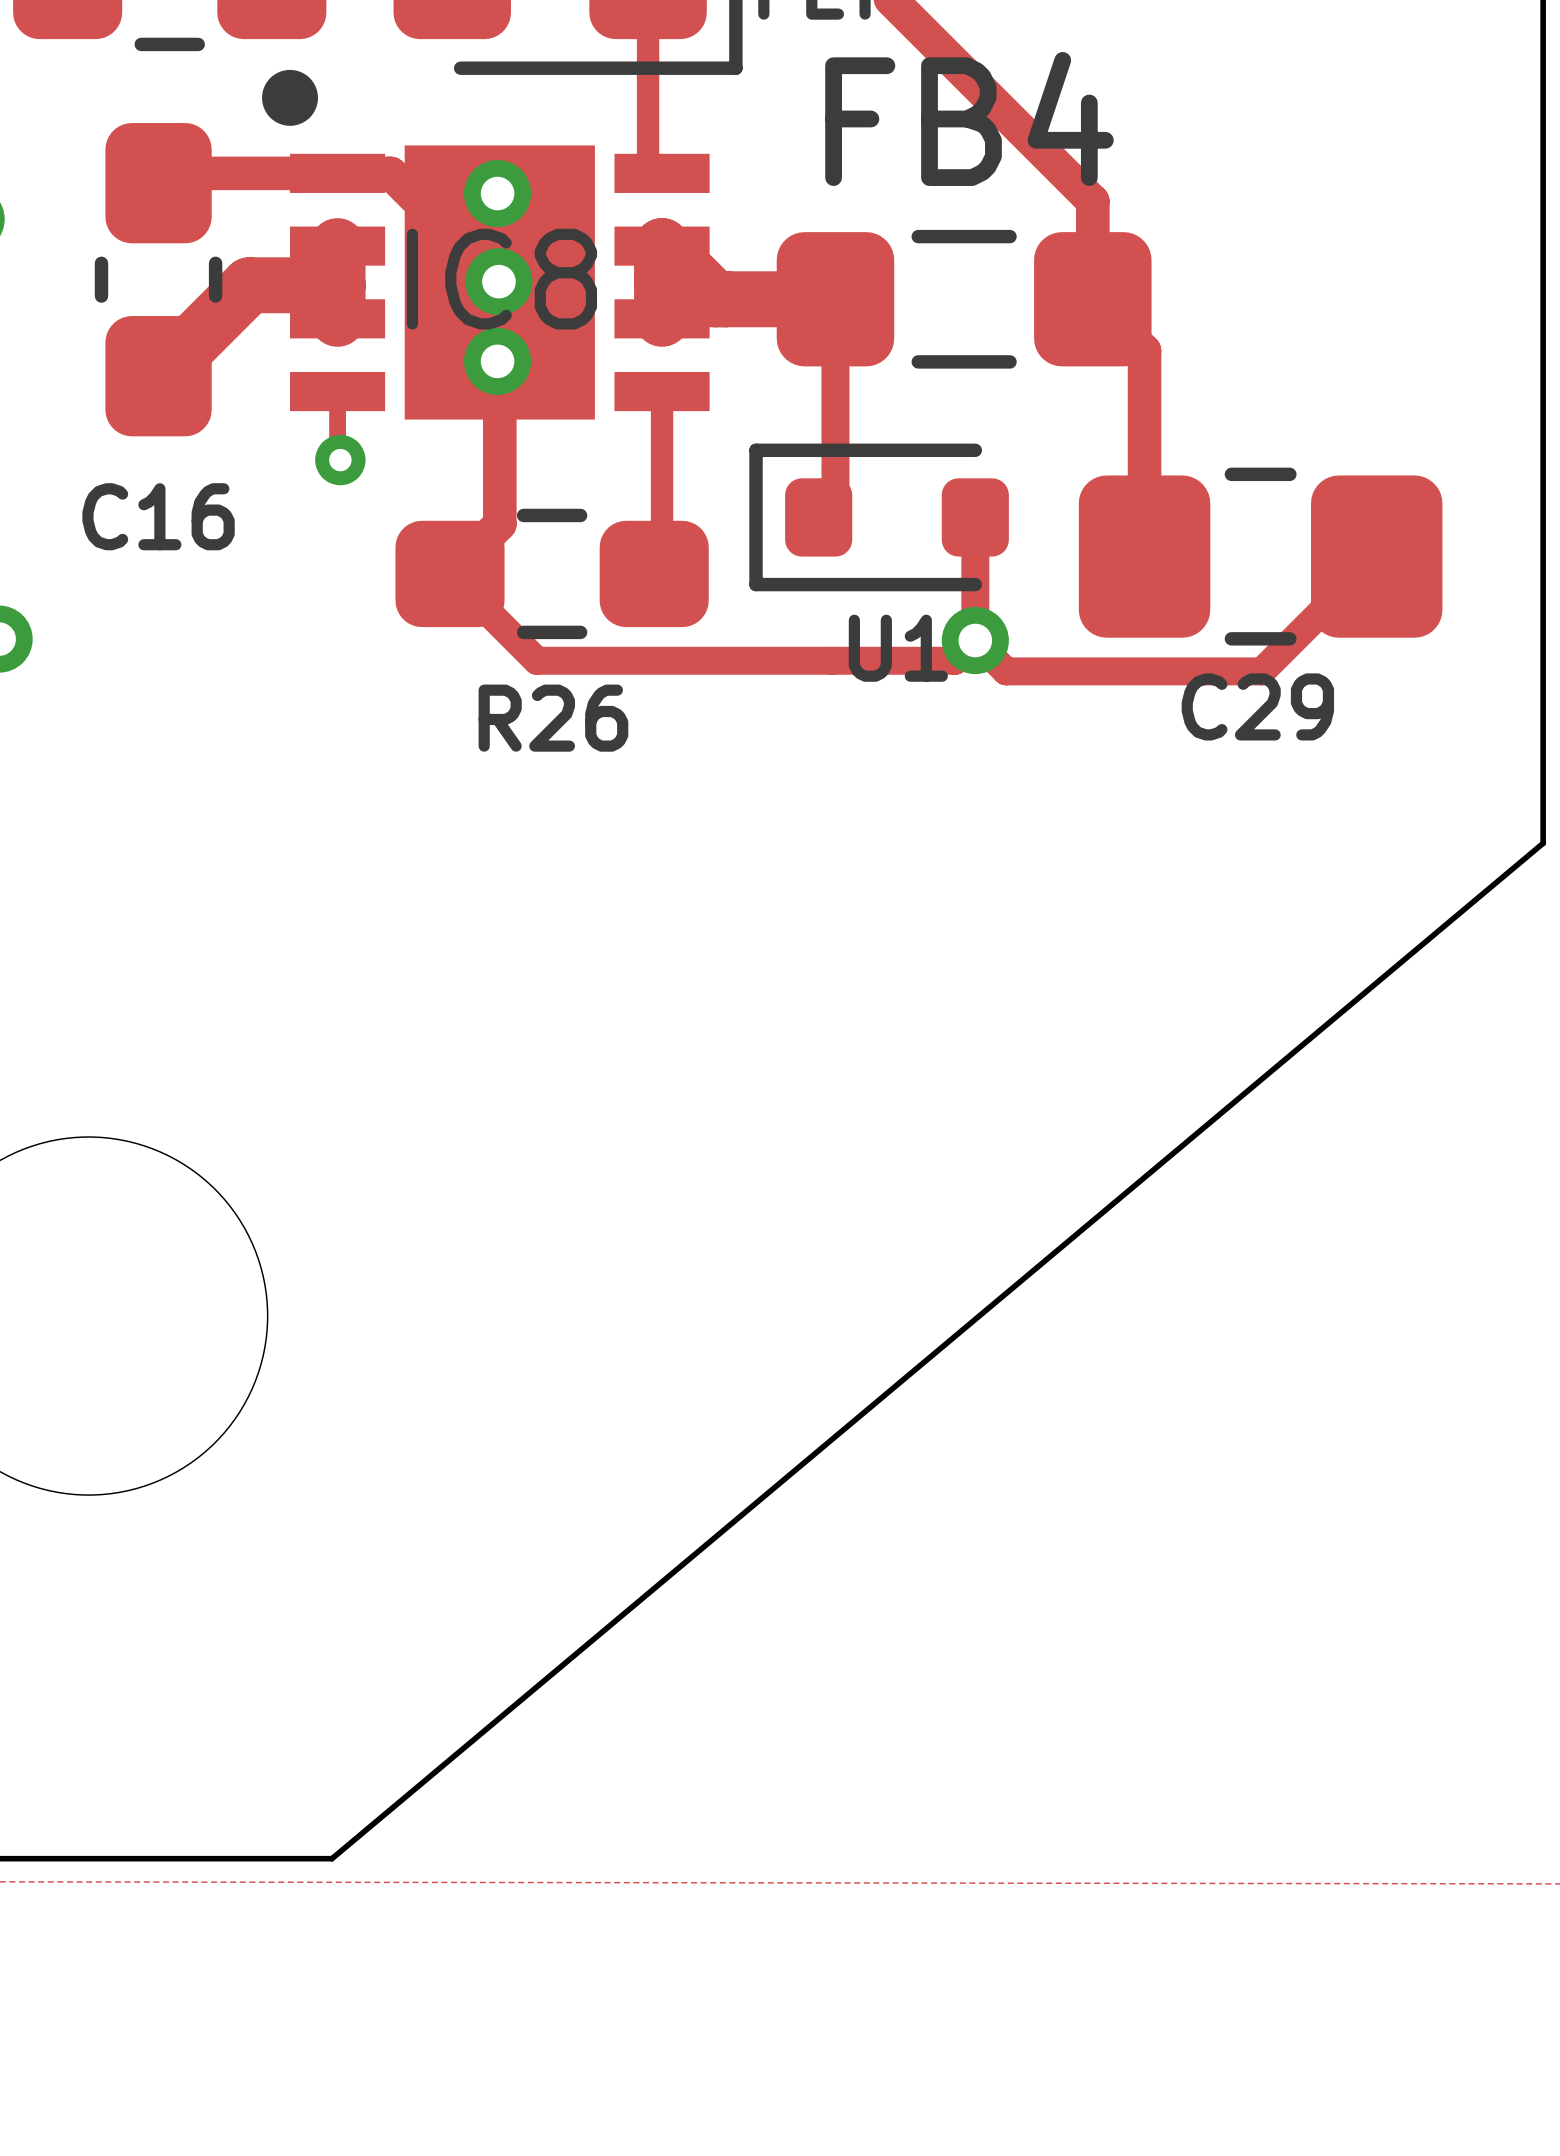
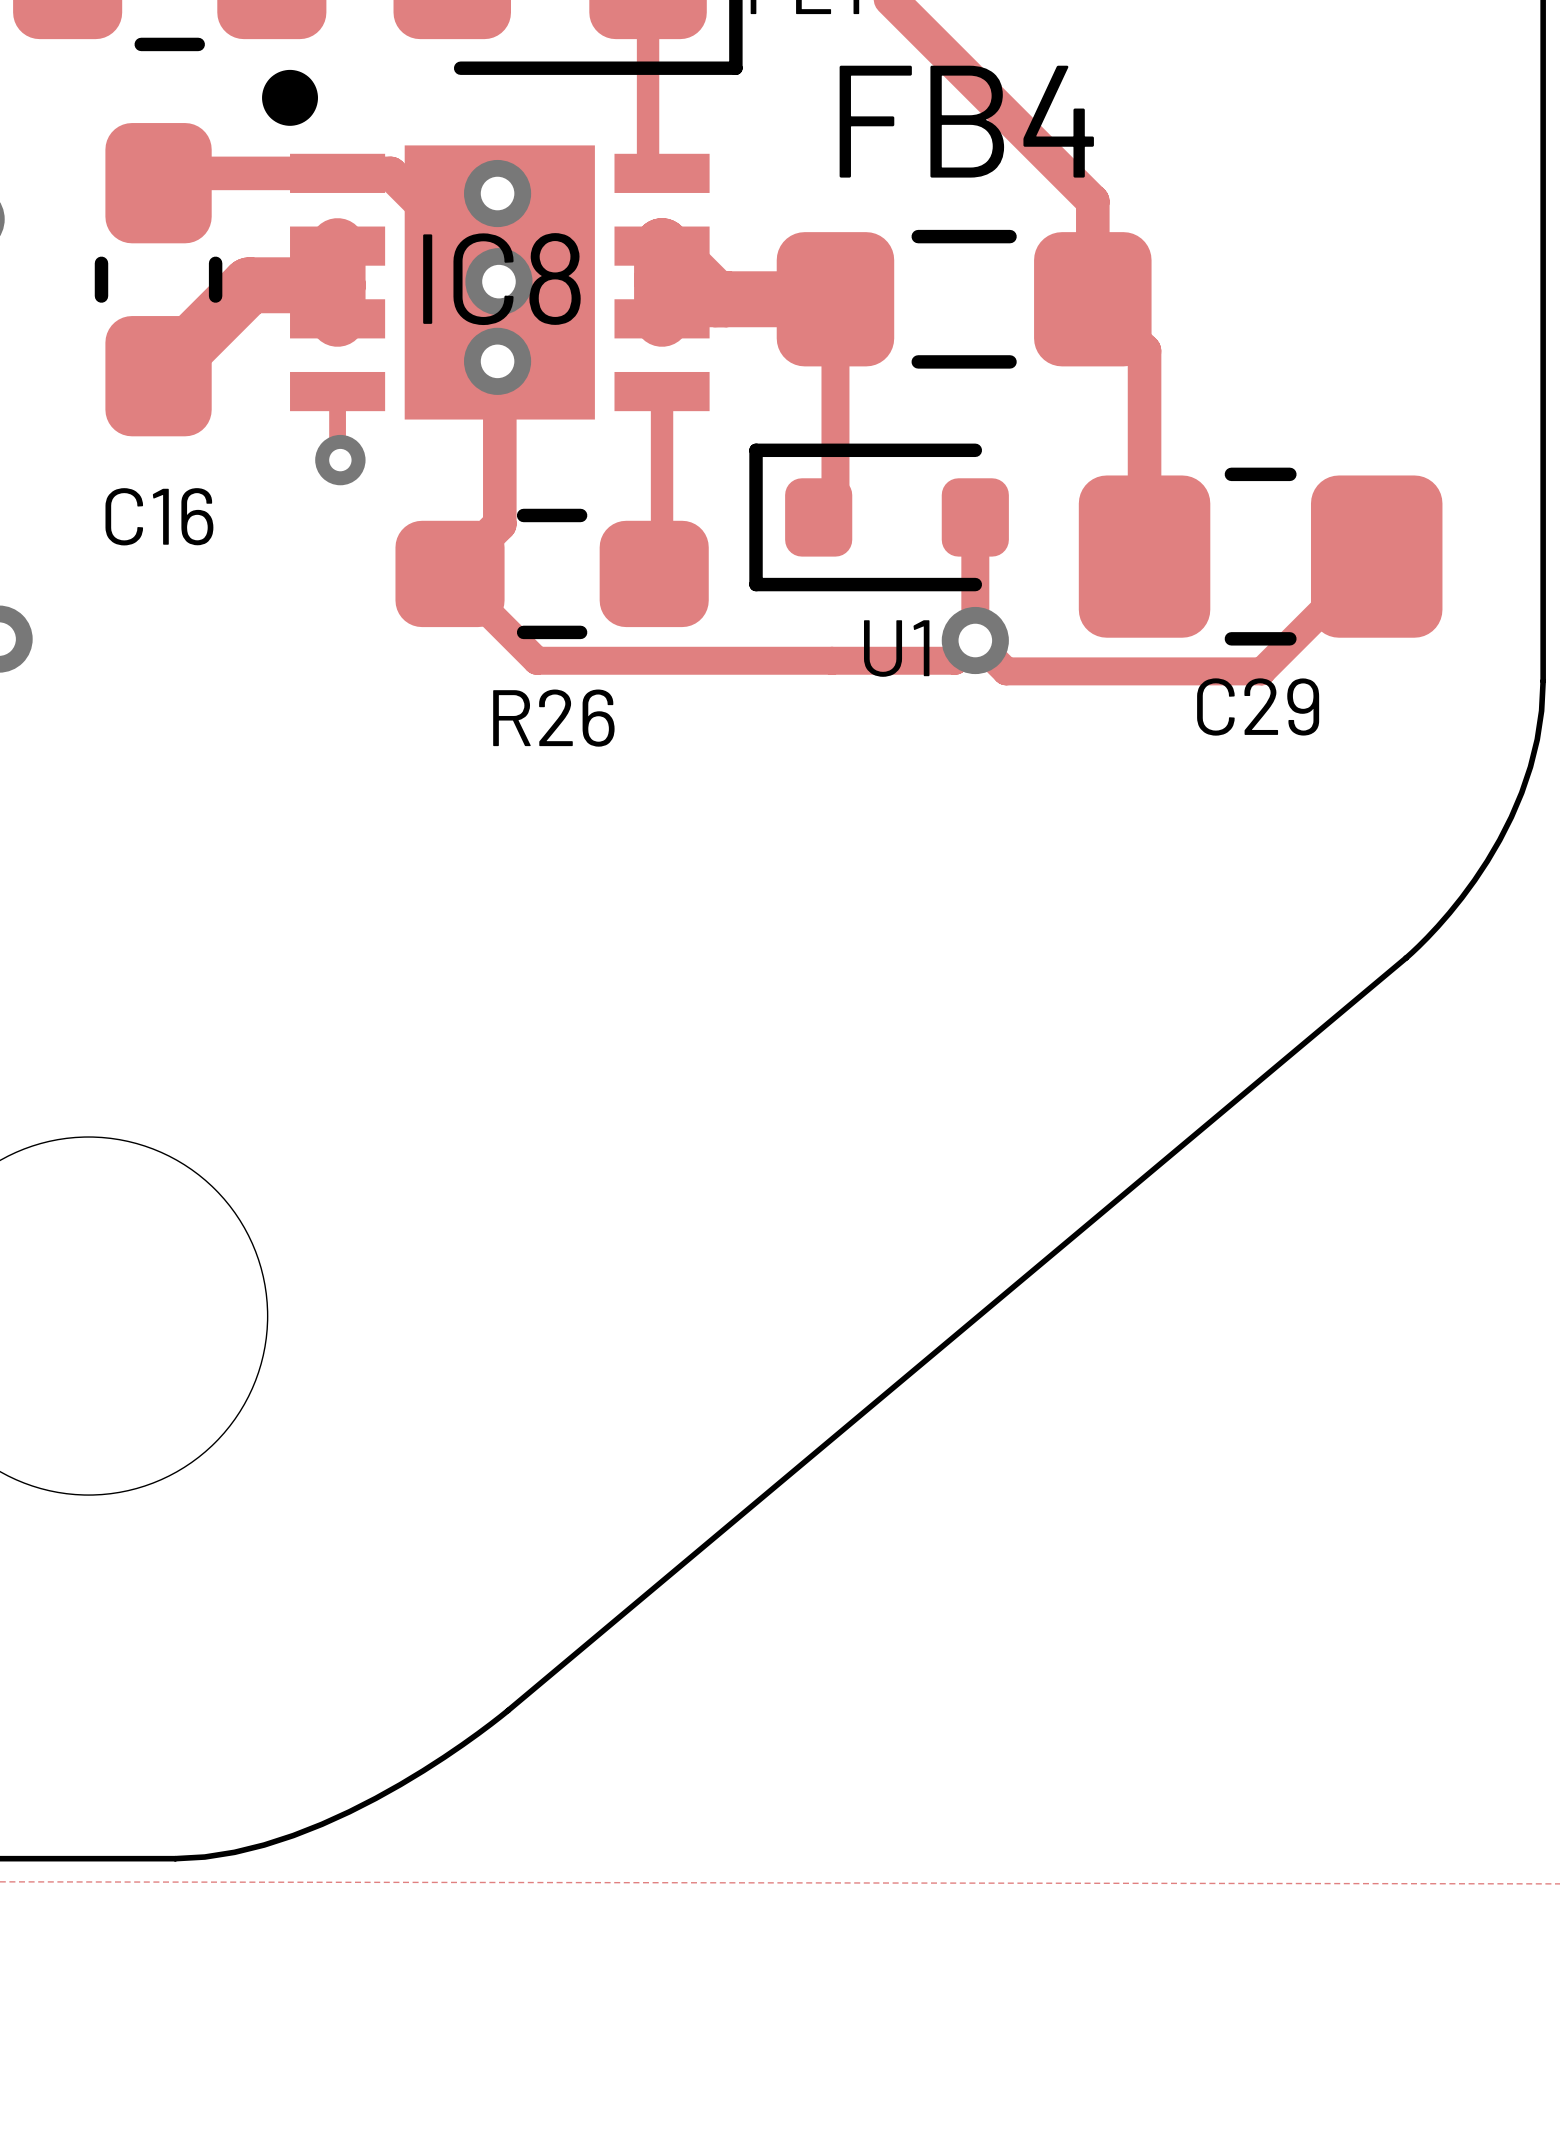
board edge: (1543, 681) (1543, 843) (331, 1858) (175, 1858) -> (1543, 681) (1537, 739) (1530, 766) (1511, 817) (1487, 861) (1461, 897) (1437, 926) (1406, 957) (478, 1733) (400, 1784) (321, 1824) (264, 1845) (234, 1852) (204, 1857) (175, 1858)

